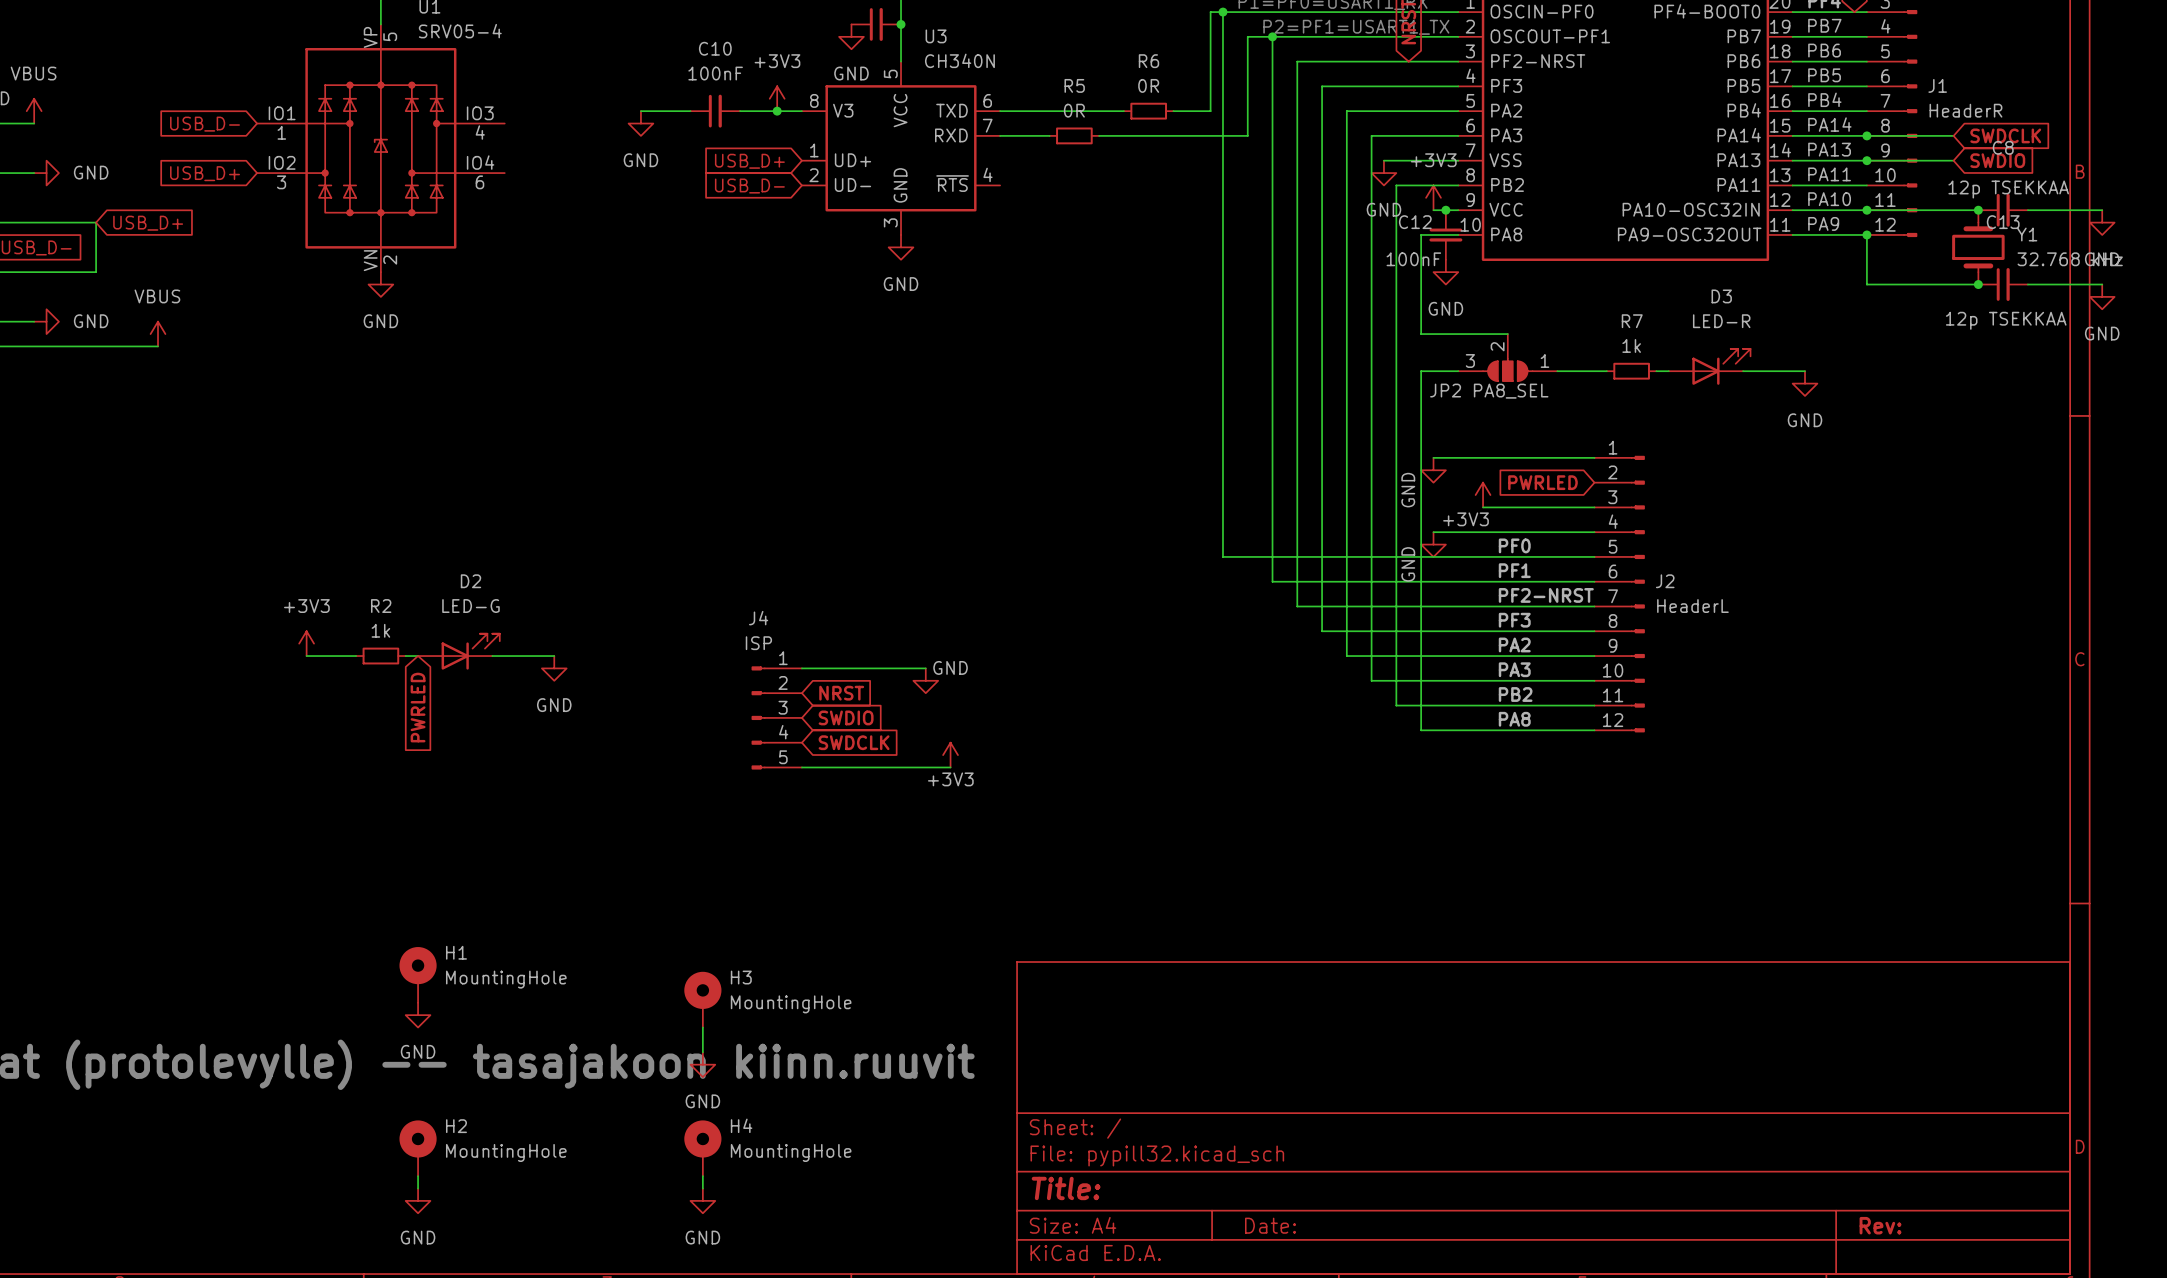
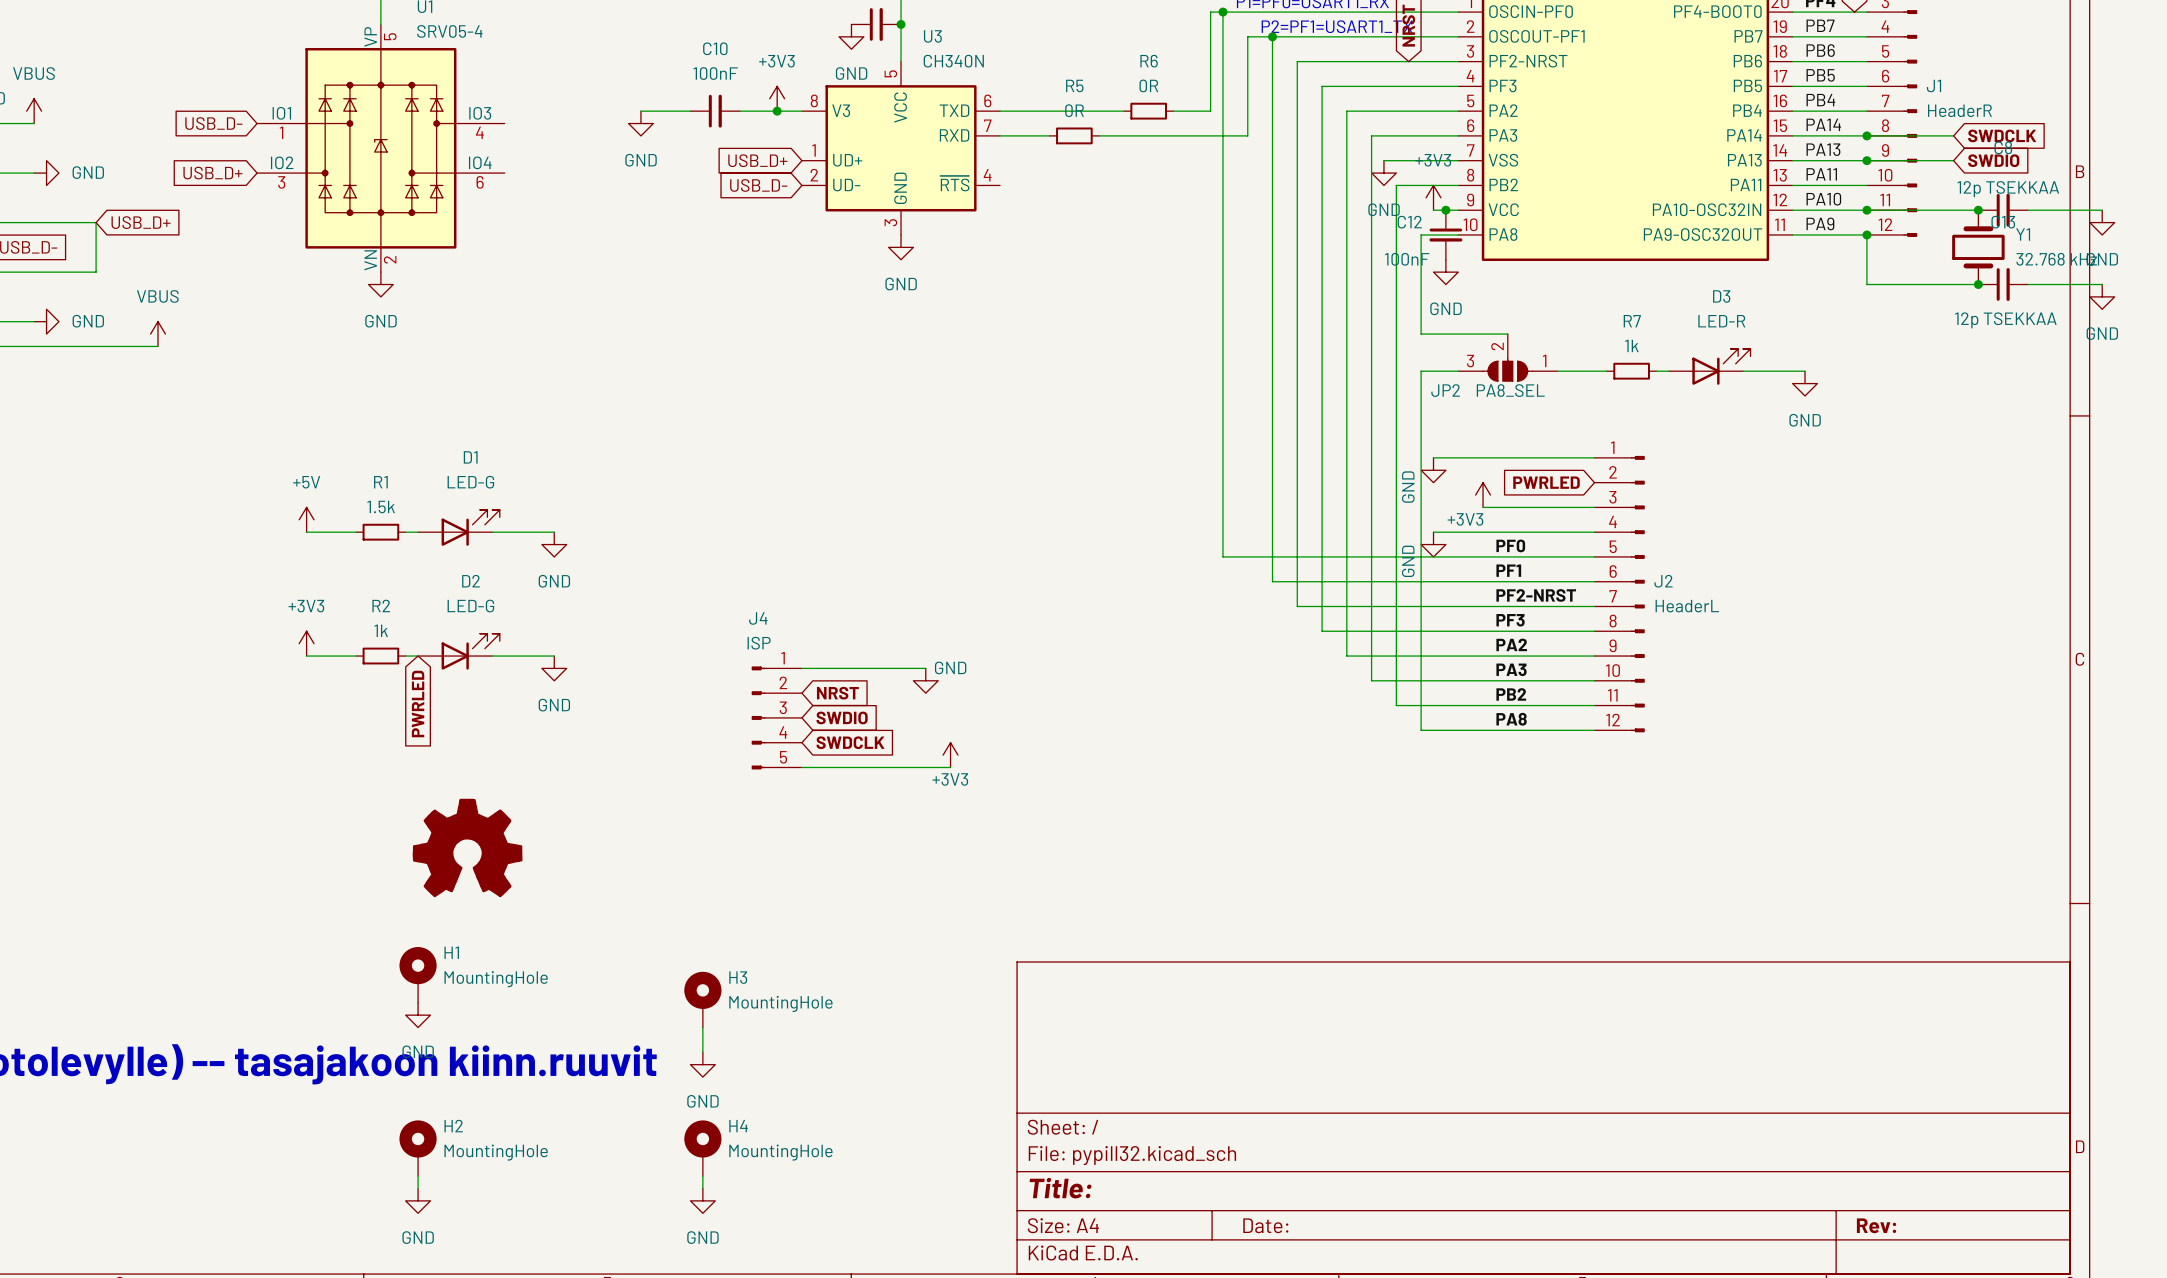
power symbol: none -> +5V (306, 519)
D1: none -> LED-G (458, 527)
wire: none -> (306, 532) (356, 532)
R1: none -> 1.5k (380, 532)
wire: none -> (405, 532) (418, 532)
wire: none -> (492, 532) (554, 532)
power symbol: none -> GND (554, 544)
power symbol: none -> (467, 847)

